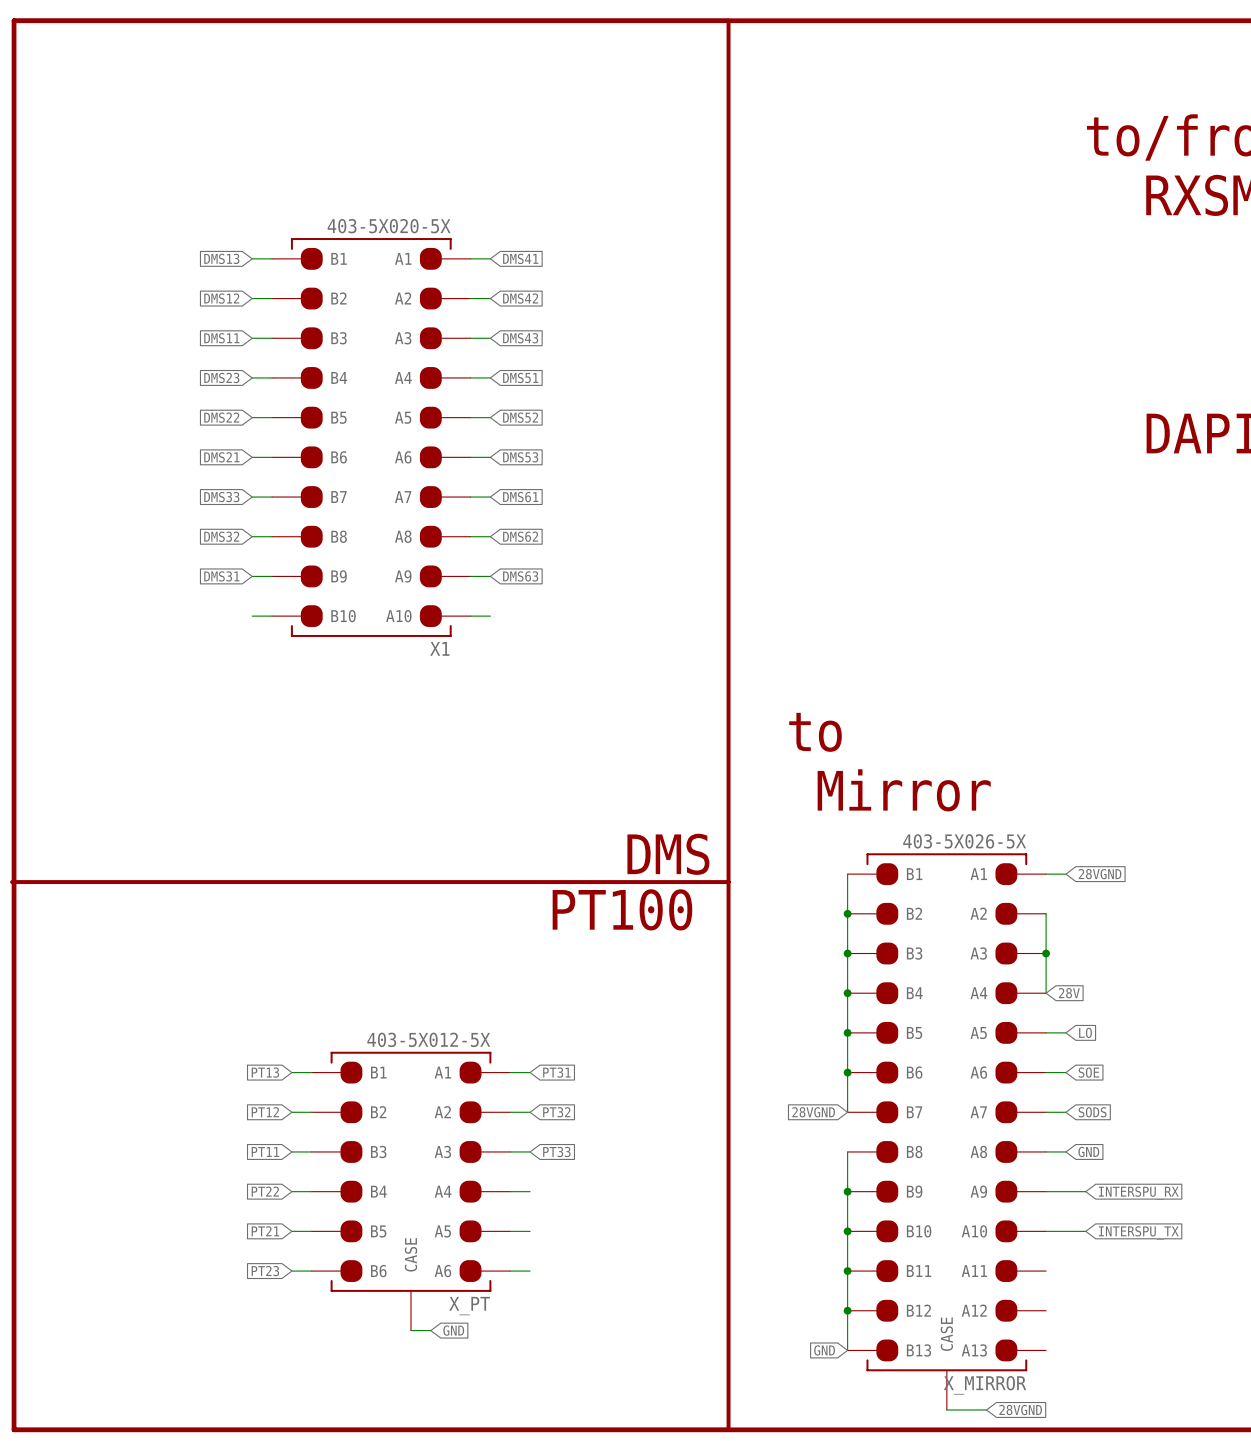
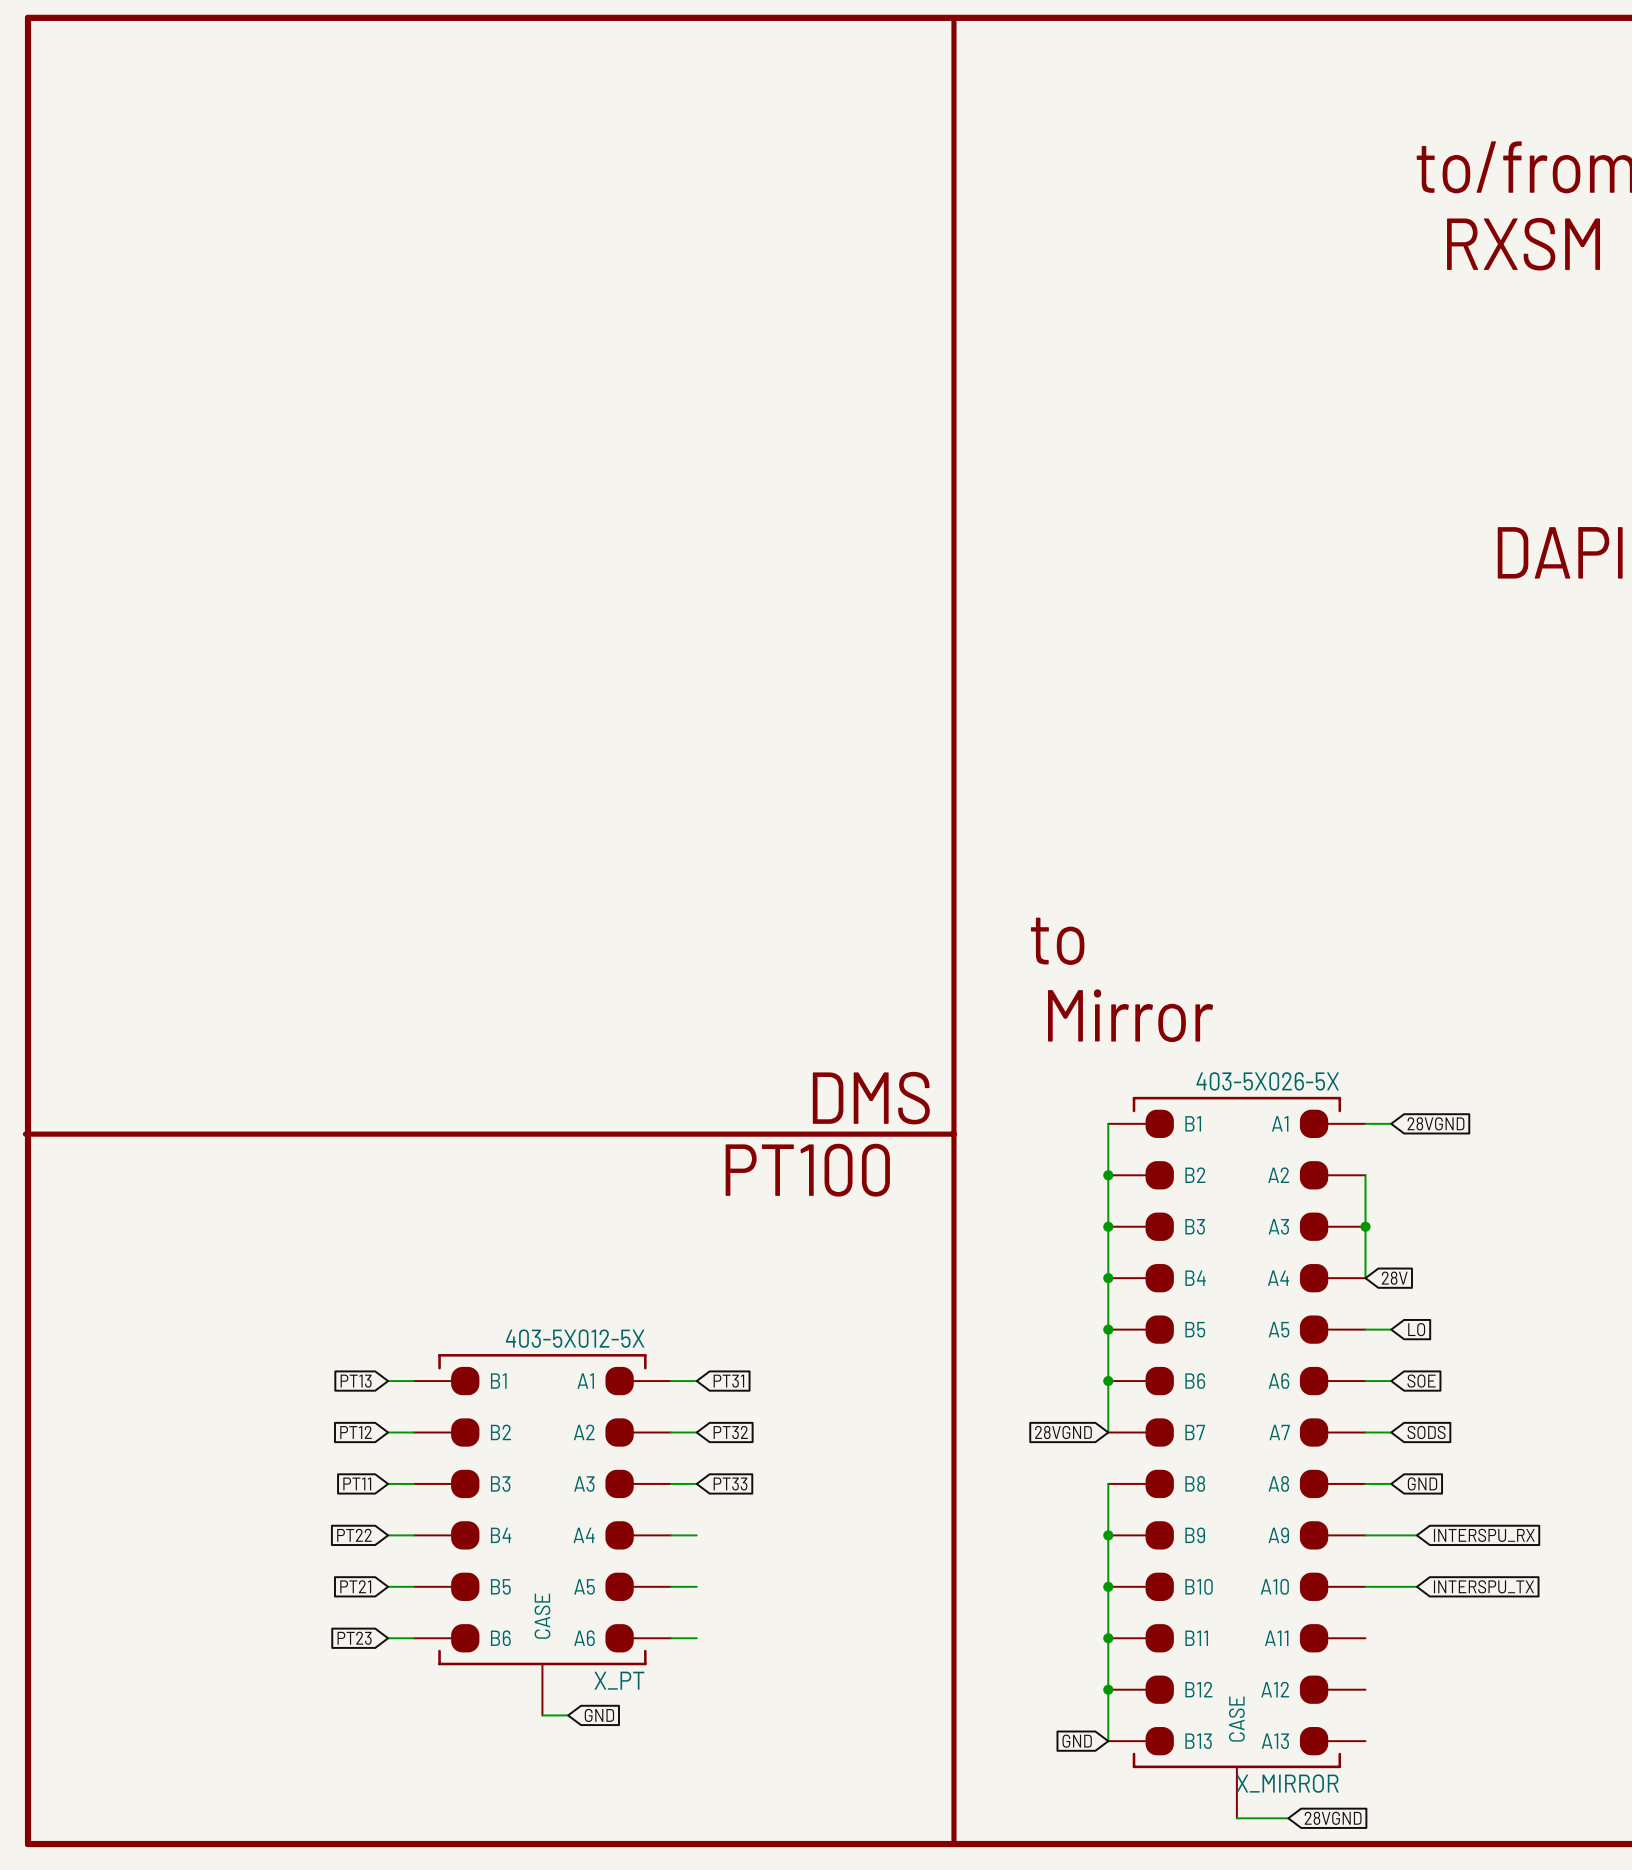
global label: DMS13 (221, 258) -> none
wire: (252, 258) (272, 258) -> none
wire: (470, 258) (490, 258) -> none
global label: DMS41 (520, 258) -> none
global label: DMS12 (221, 298) -> none
wire: (252, 298) (272, 298) -> none
wire: (470, 298) (490, 298) -> none
global label: DMS42 (520, 298) -> none
global label: DMS11 (221, 338) -> none
wire: (252, 338) (272, 338) -> none
wire: (470, 338) (490, 338) -> none
global label: DMS43 (520, 338) -> none
global label: DMS23 (221, 377) -> none
wire: (252, 377) (272, 377) -> none
wire: (470, 377) (490, 377) -> none
global label: DMS51 (520, 377) -> none
global label: DMS22 (221, 417) -> none
wire: (252, 417) (272, 417) -> none
wire: (470, 417) (490, 417) -> none
global label: DMS52 (520, 417) -> none
X1: 403-5X020-5X (371, 437) -> none
global label: DMS21 (221, 457) -> none
wire: (252, 457) (272, 457) -> none
wire: (470, 457) (490, 457) -> none
global label: DMS53 (520, 457) -> none
global label: DMS33 (221, 497) -> none
wire: (252, 497) (272, 497) -> none
wire: (470, 497) (490, 497) -> none
global label: DMS61 (520, 497) -> none
global label: DMS32 (221, 536) -> none
wire: (252, 536) (272, 536) -> none
wire: (470, 536) (490, 536) -> none
global label: DMS62 (520, 536) -> none
global label: DMS31 (221, 576) -> none
wire: (252, 576) (272, 576) -> none
wire: (470, 576) (490, 576) -> none
global label: DMS63 (520, 576) -> none
wire: (252, 616) (272, 616) -> none
wire: (470, 616) (490, 616) -> none

